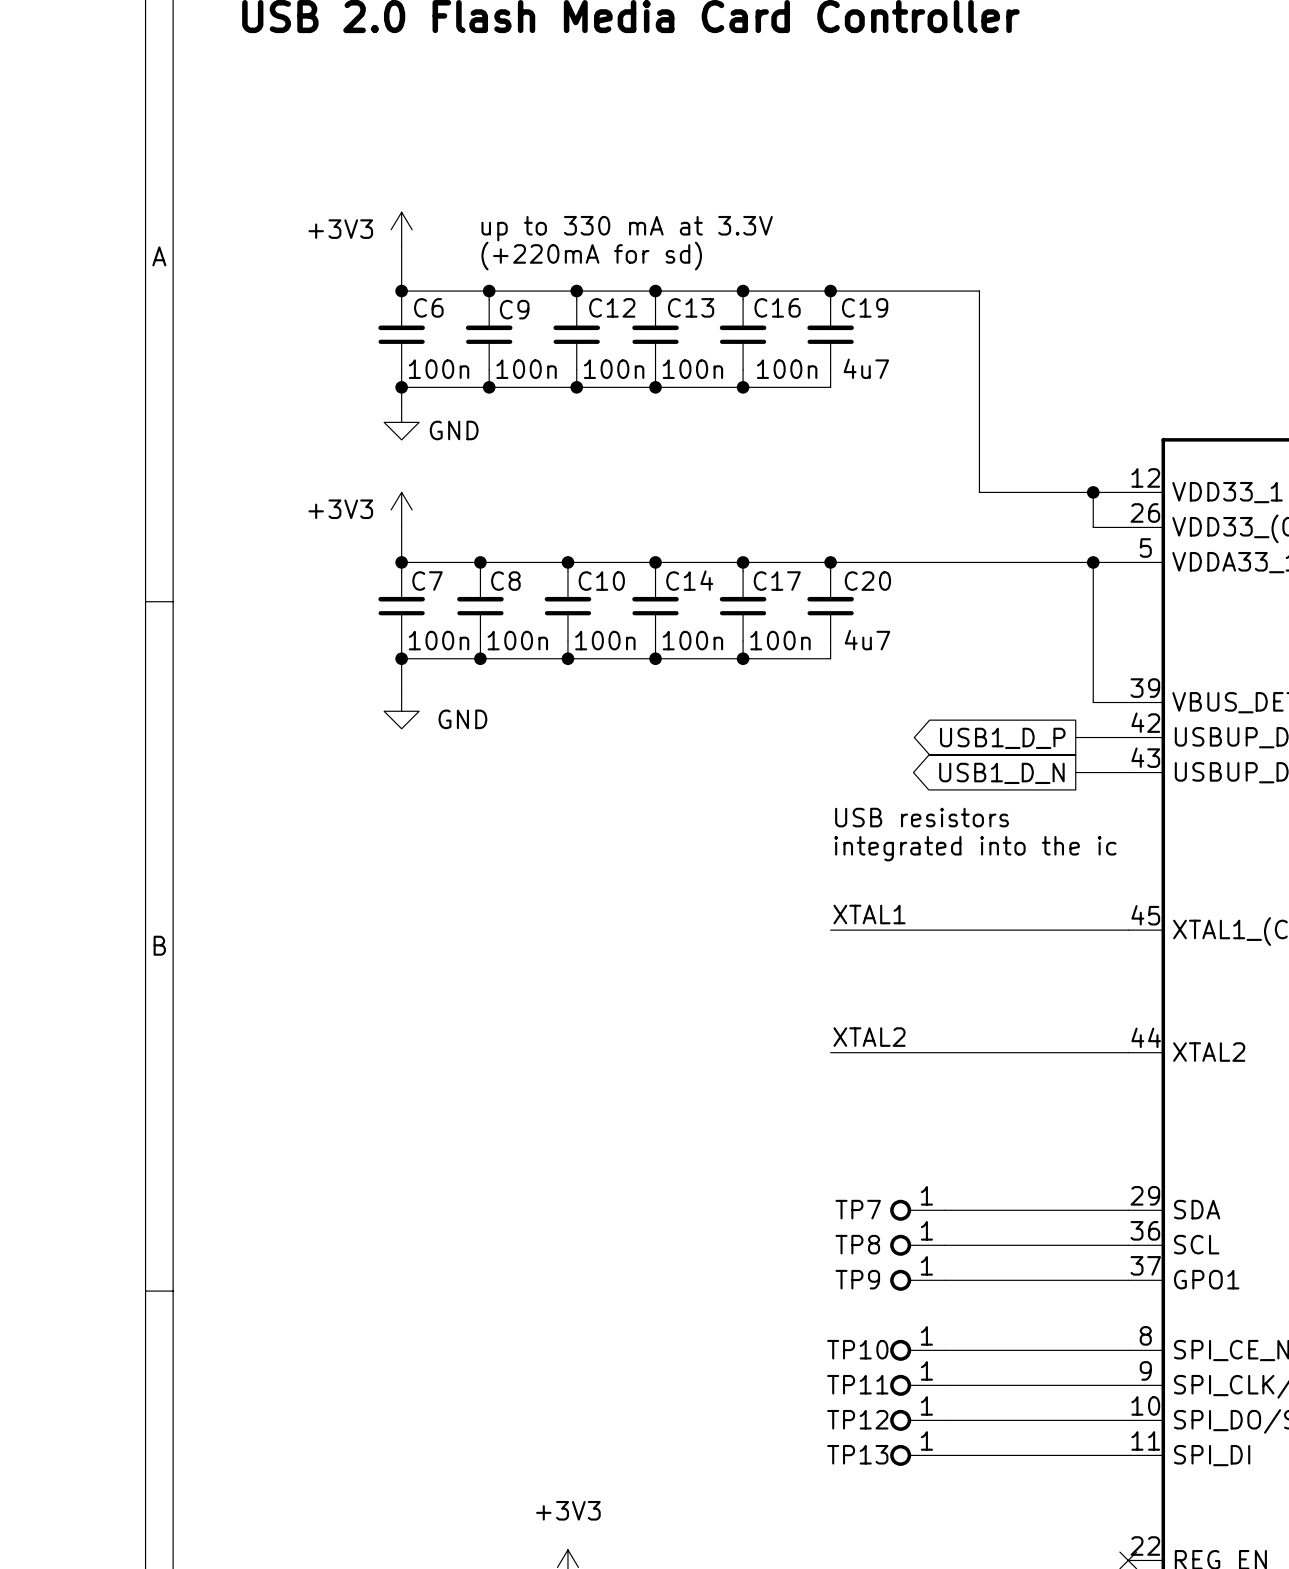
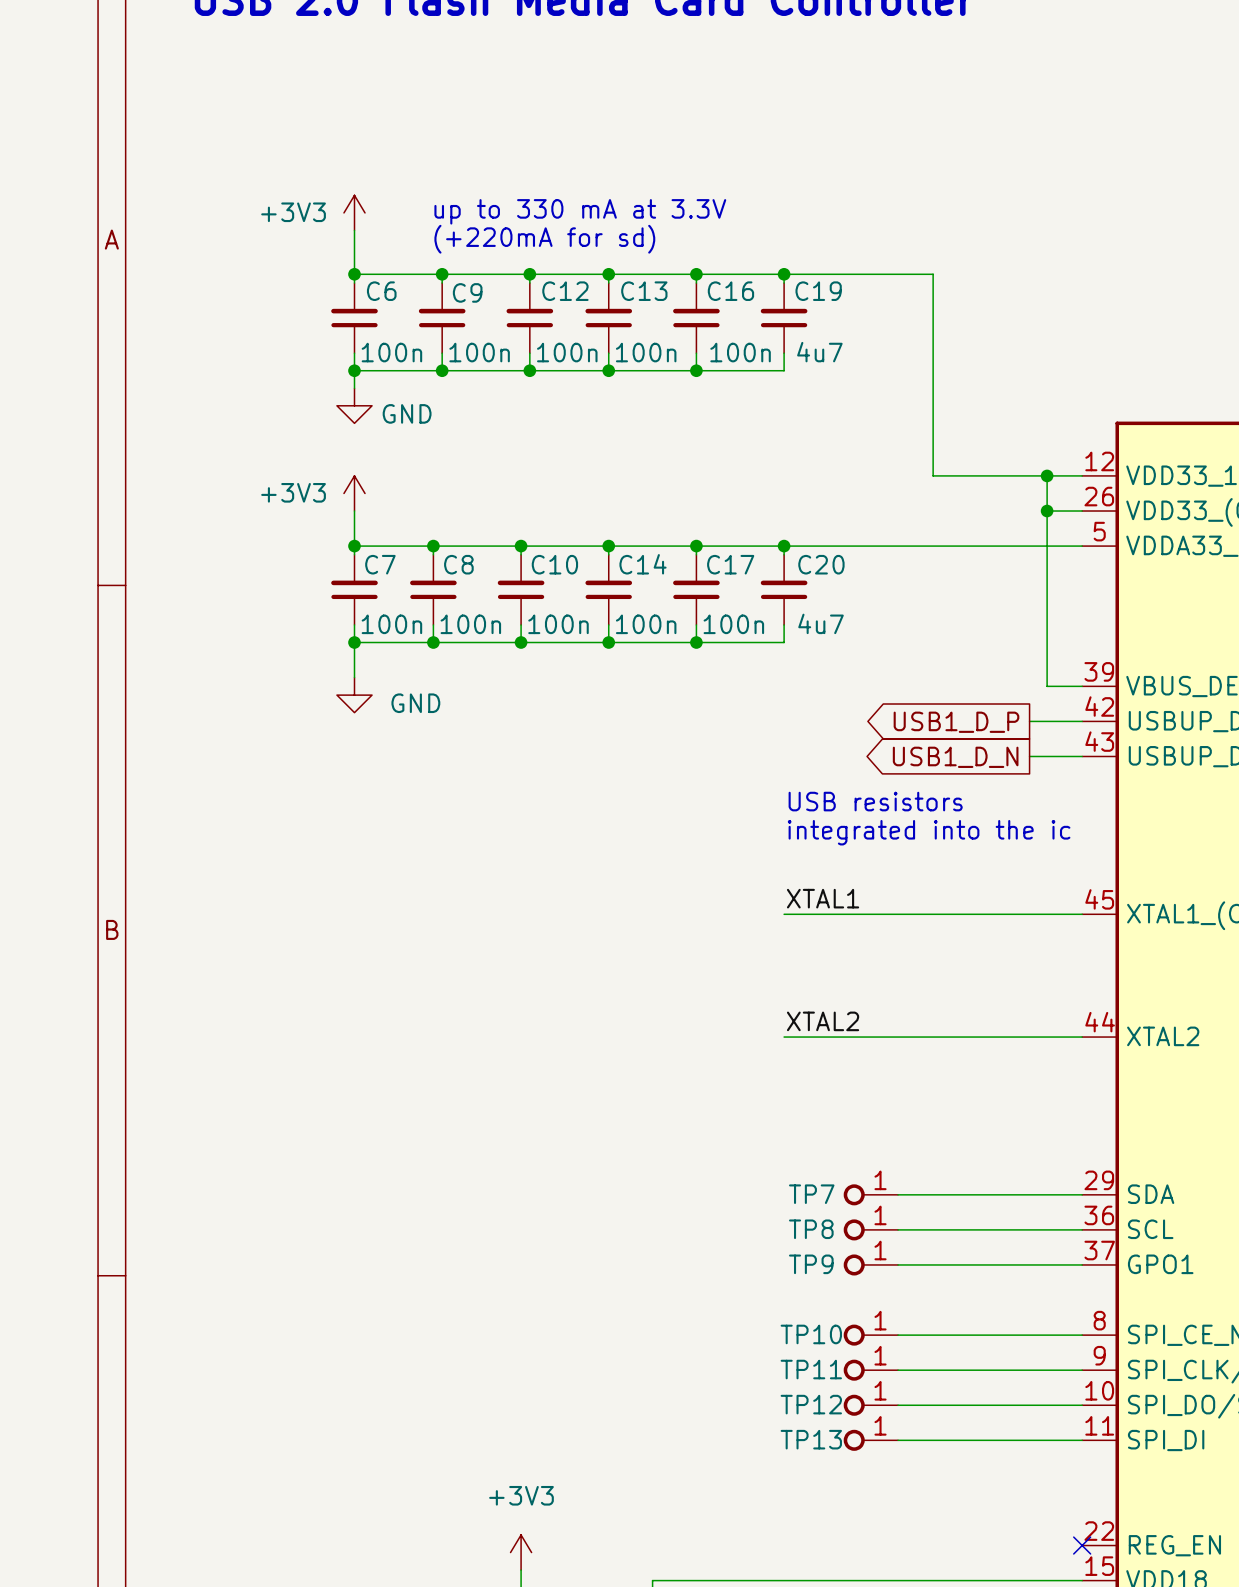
wire: none -> (1047, 511) (1047, 546)
junction position: (1093, 562) -> (1047, 511)

